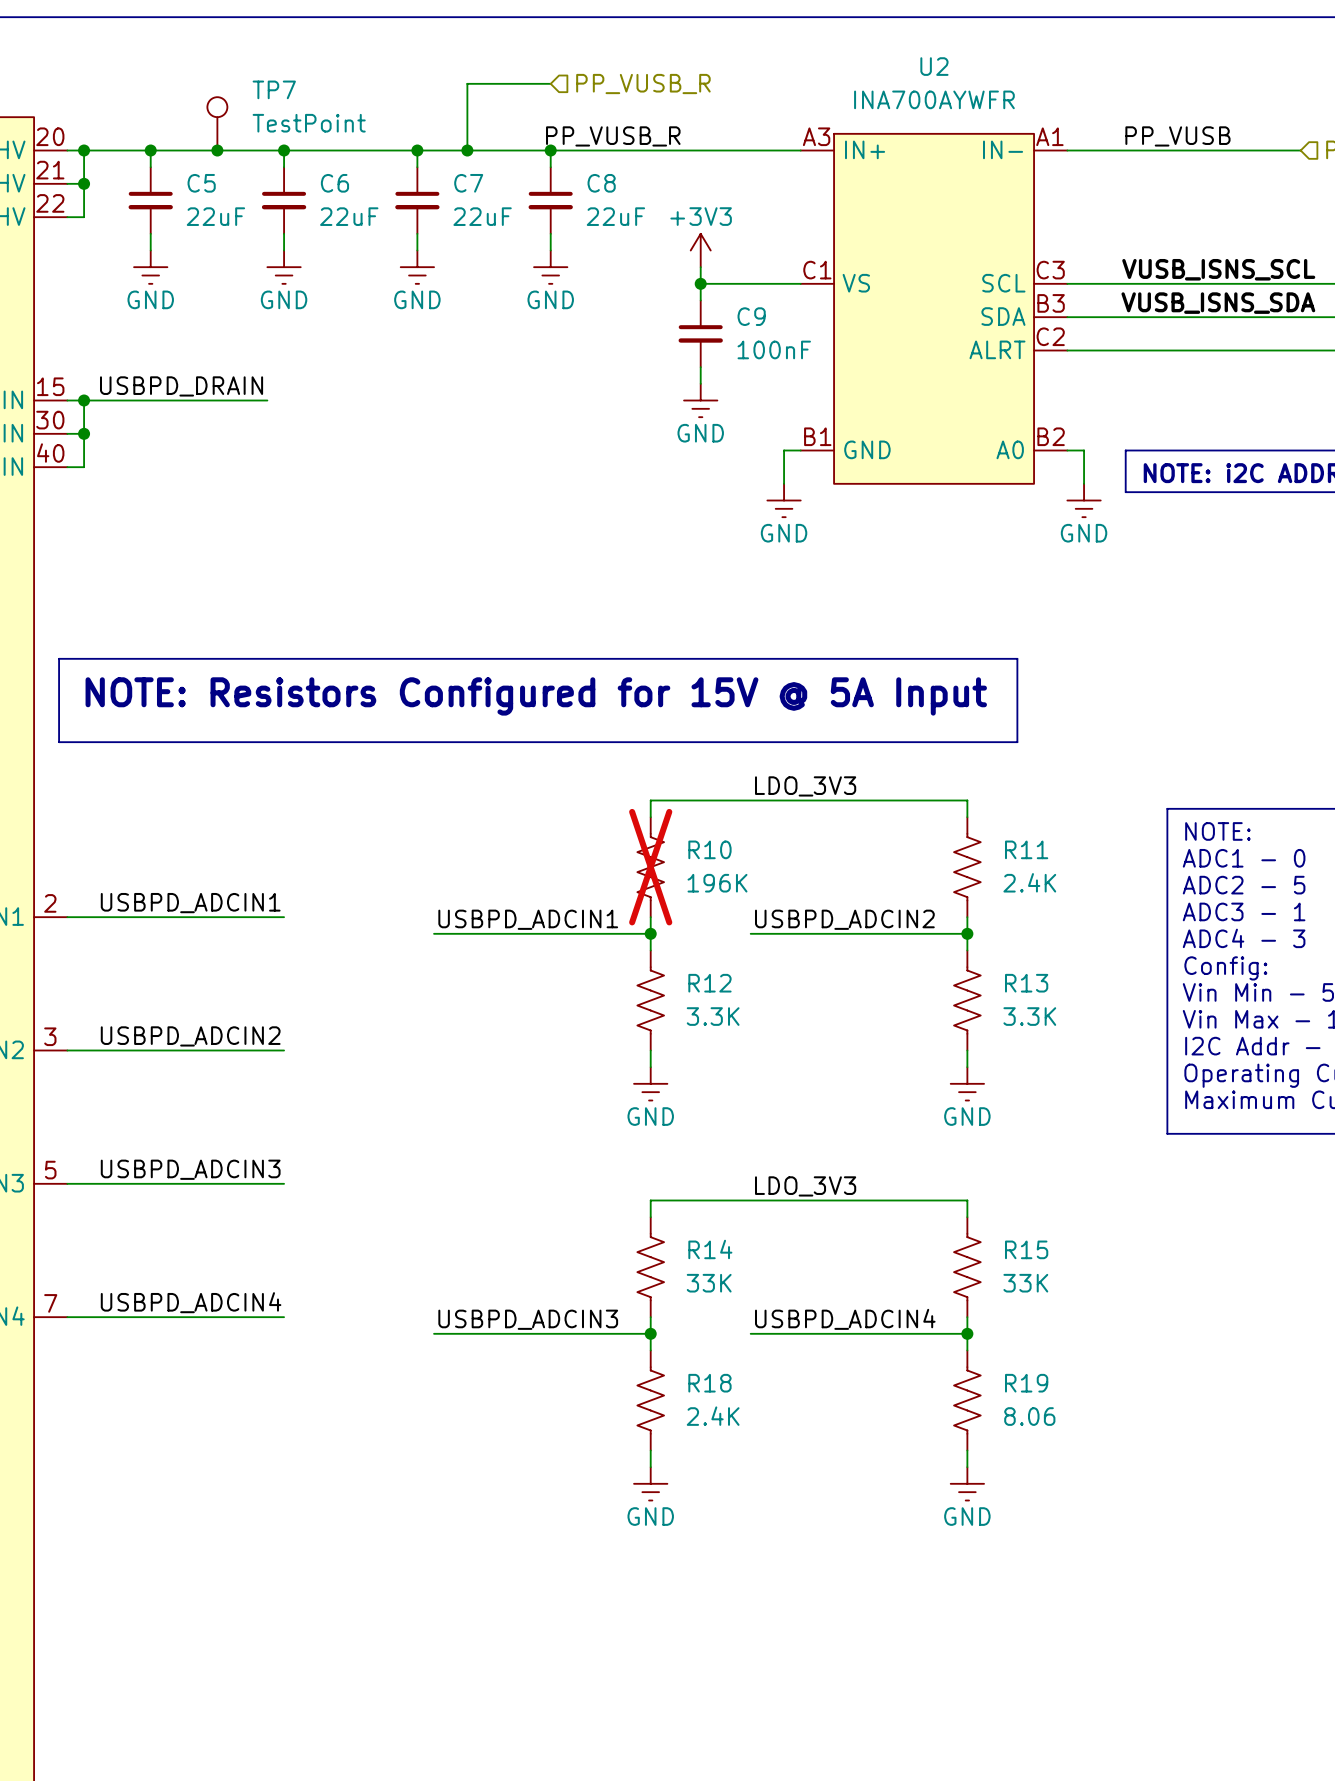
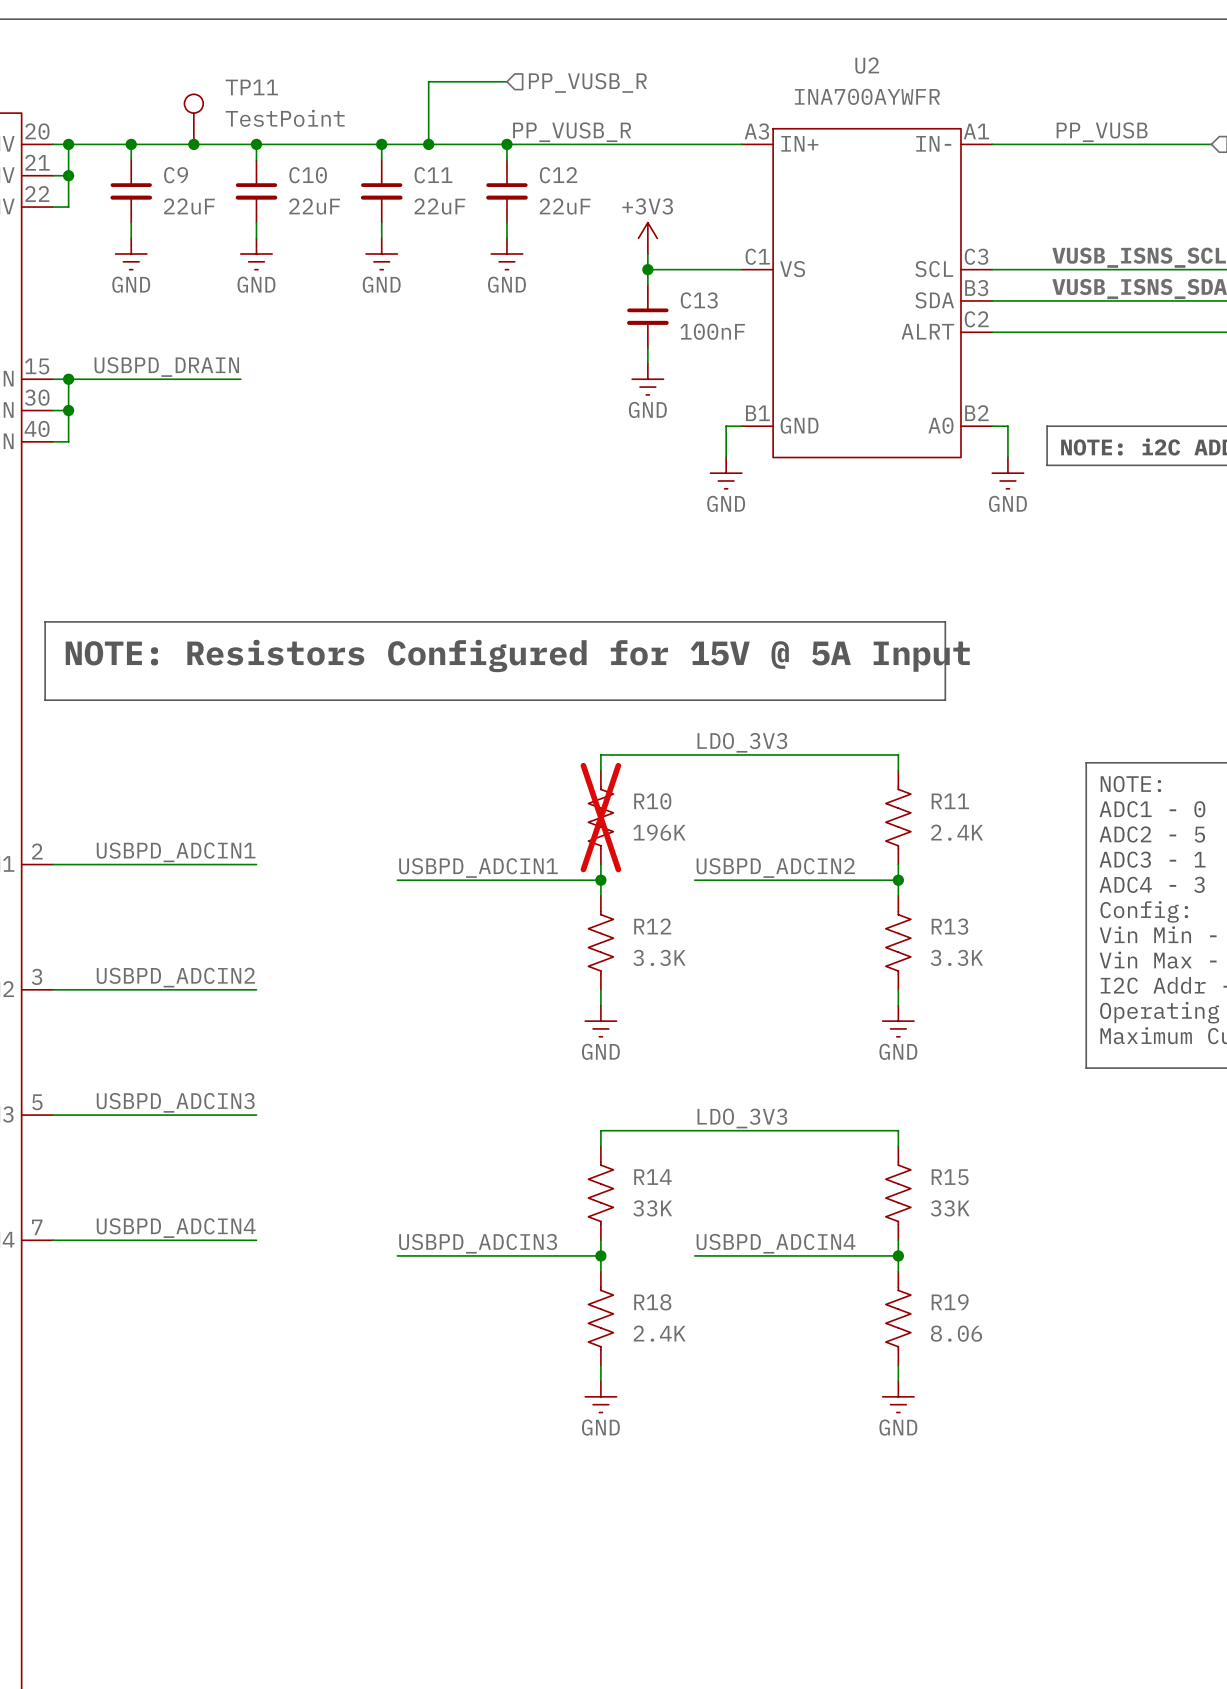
TP7 name: TP7 (274, 89) -> TP11 (251, 87)
C5 name: C5 (201, 183) -> C9 (176, 175)
C6 name: C6 (334, 183) -> C10 (308, 175)
C7 name: C7 (468, 183) -> C11 (433, 175)
C8 name: C8 (601, 183) -> C12 (558, 175)
C9 name: C9 (751, 316) -> C13 (699, 300)

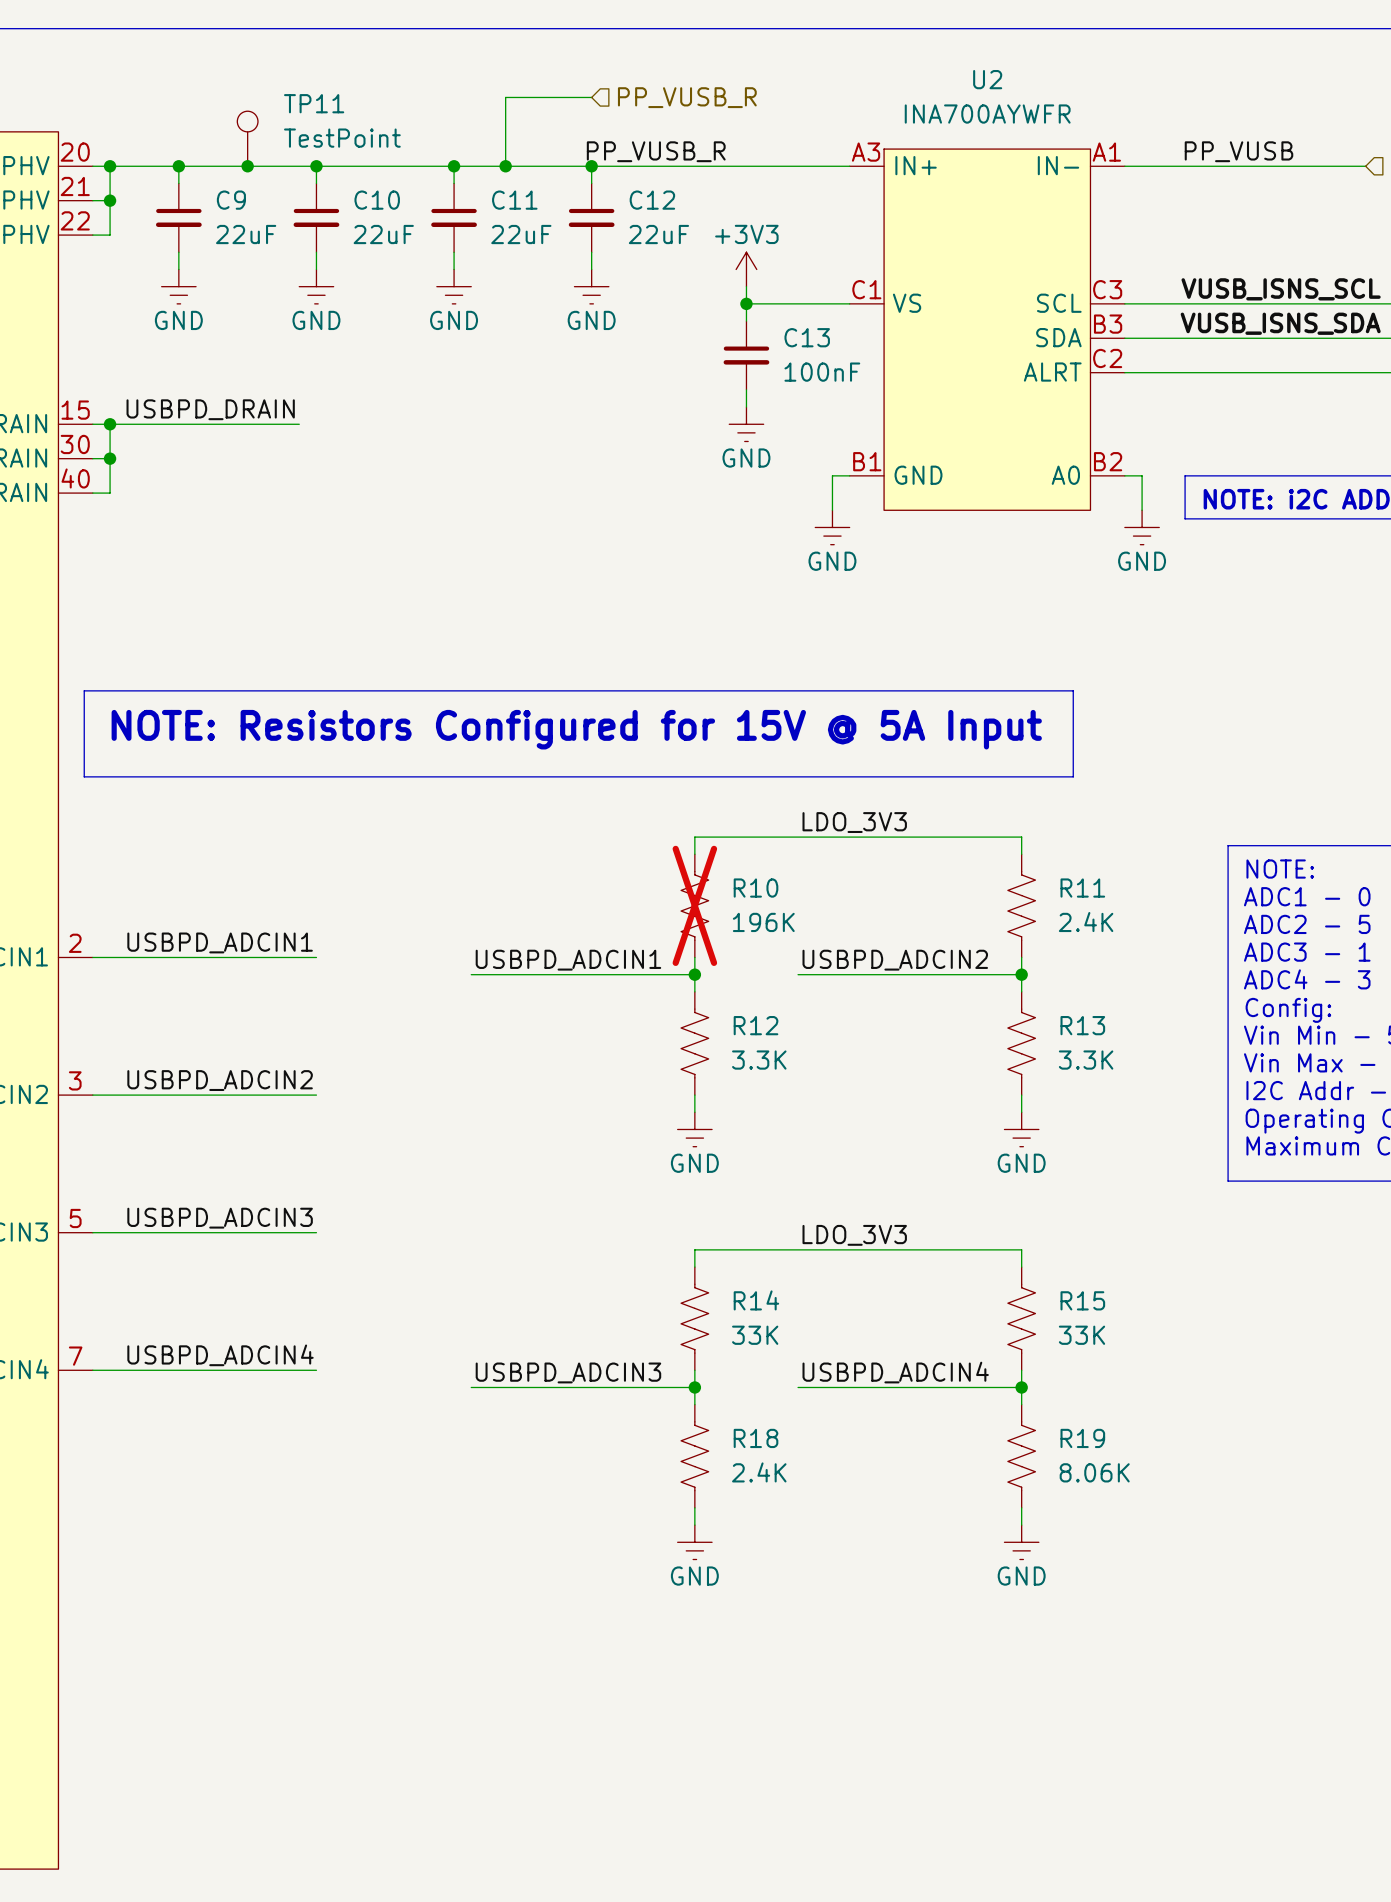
R19 value: 8.06 (956, 1333) -> 8.06K (1094, 1472)

